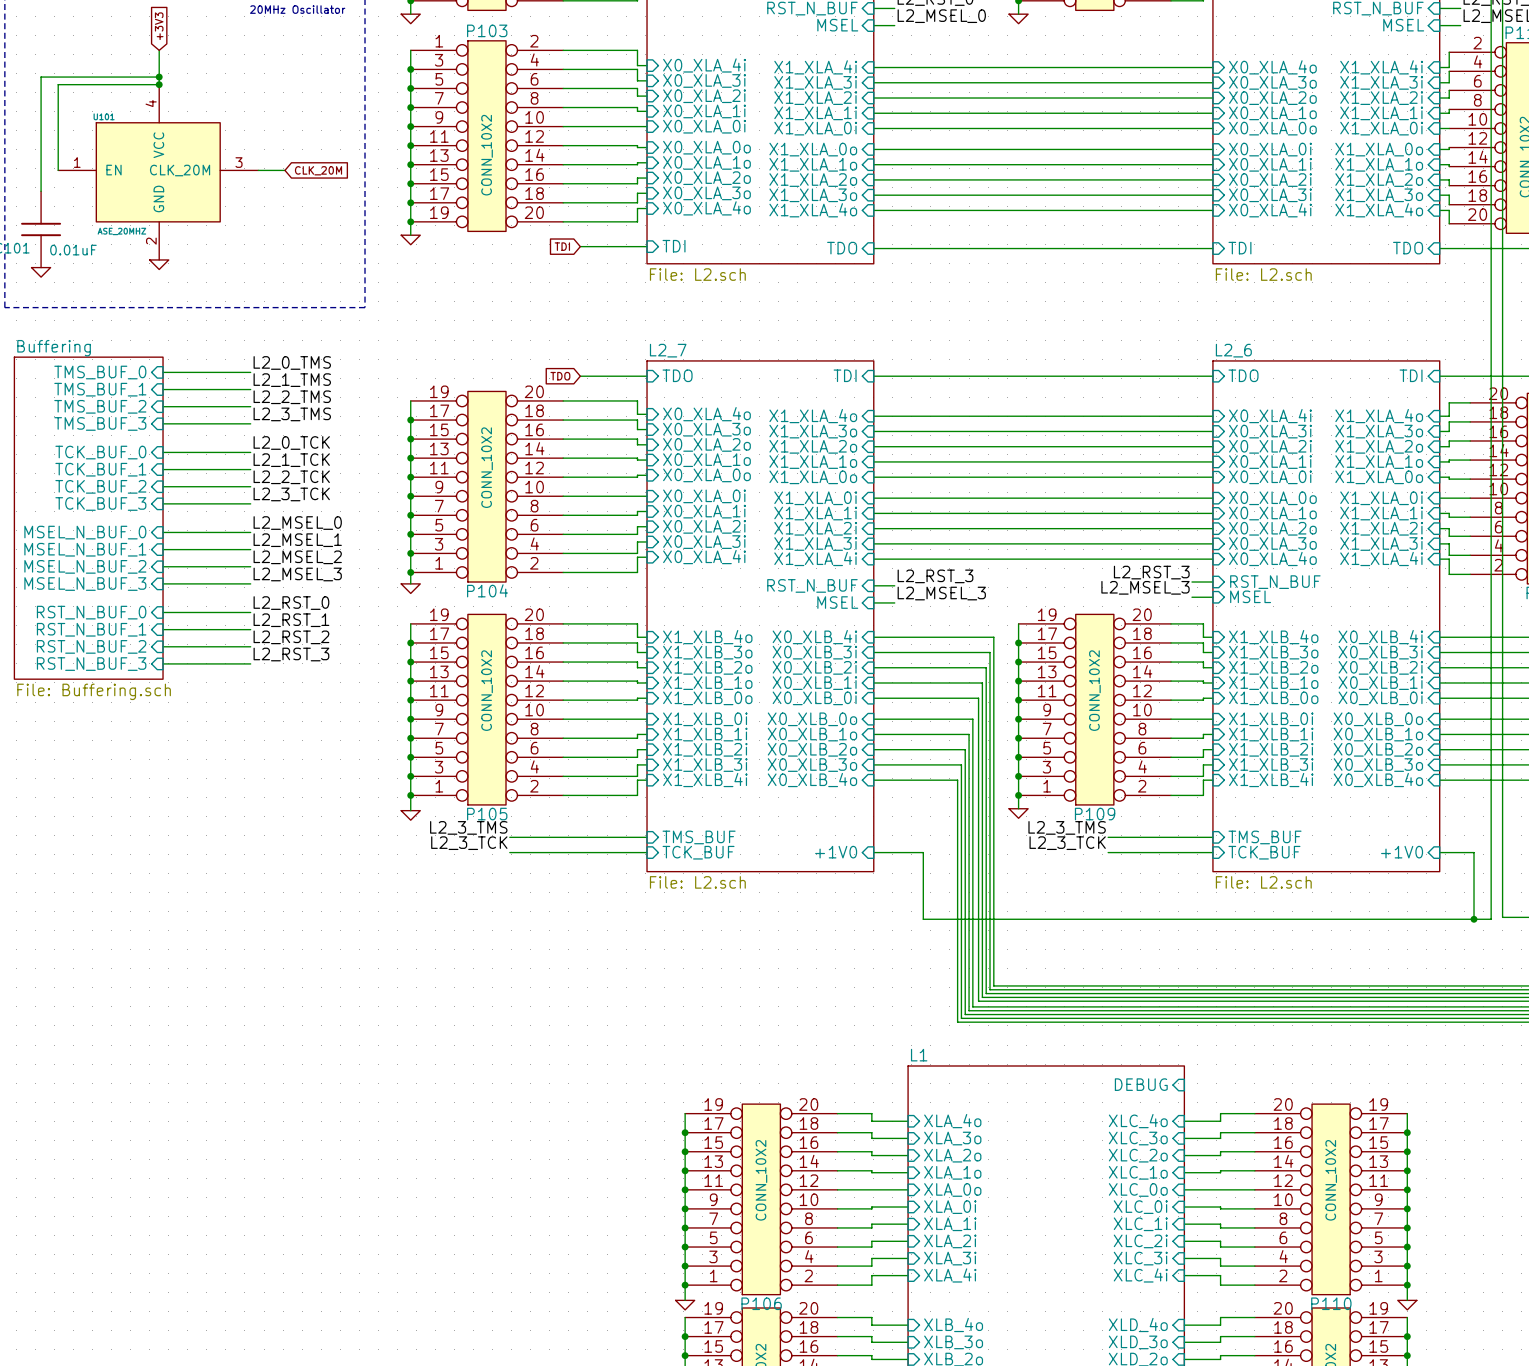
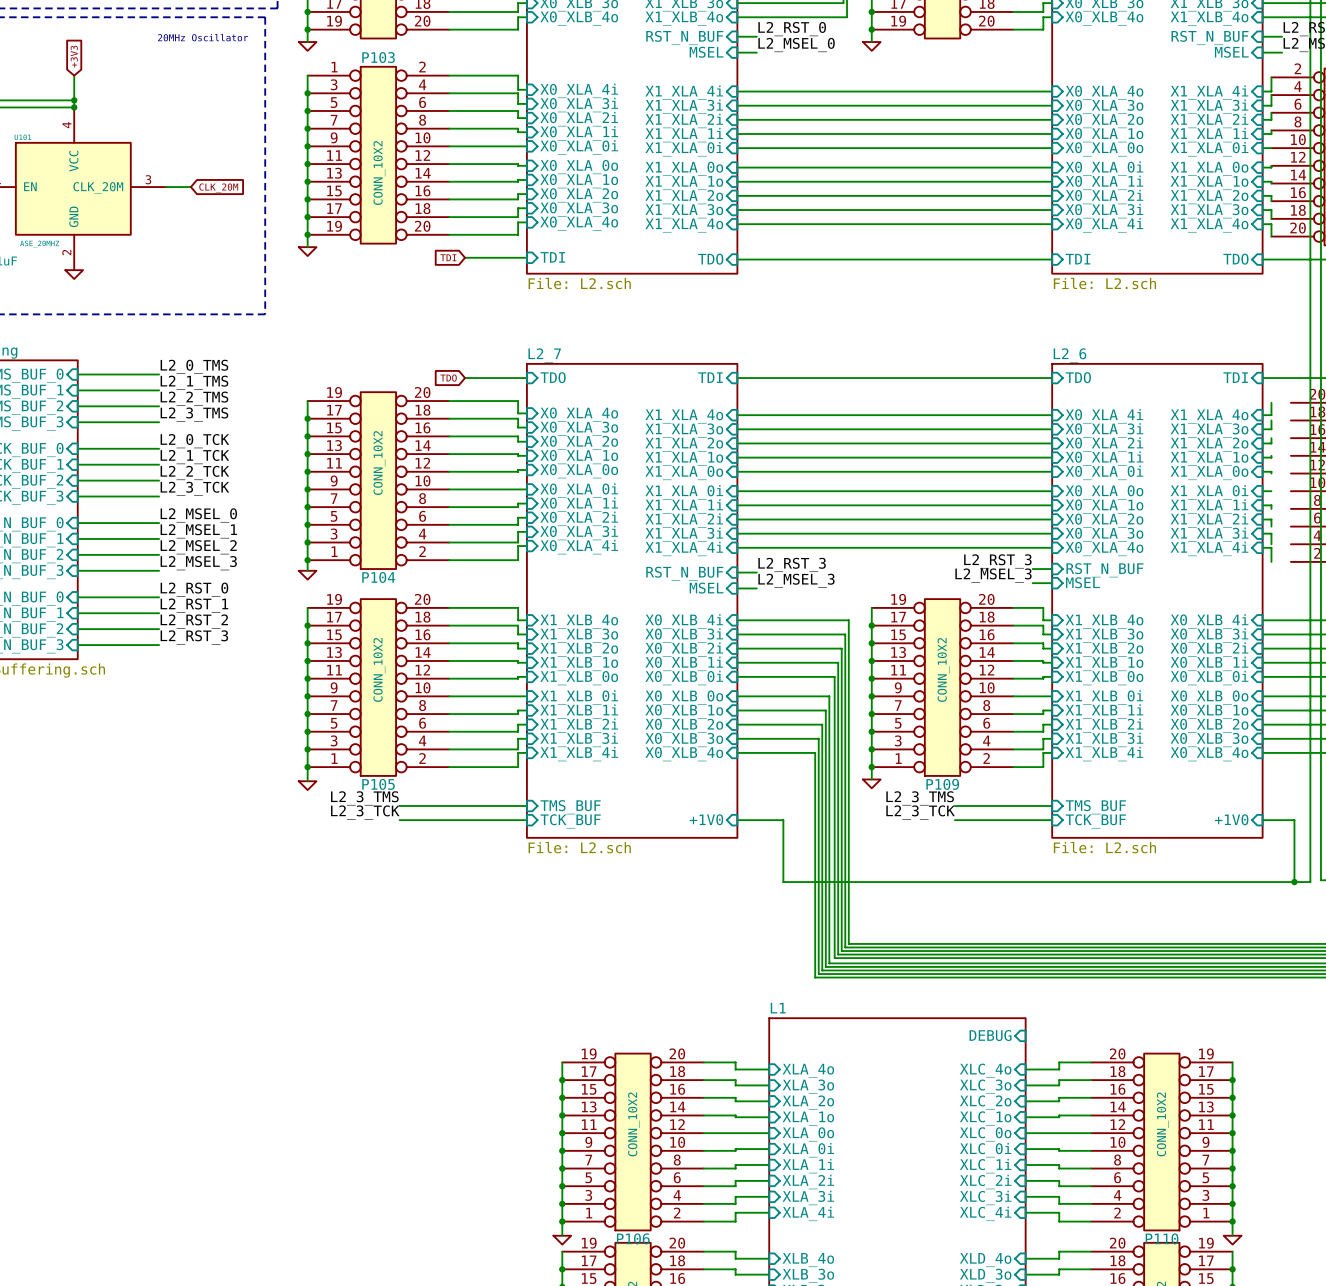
wire: (1449, 402) (1470, 402) -> none
wire: (1449, 421) (1470, 421) -> none
wire: (1449, 440) (1470, 440) -> none
wire: (1449, 460) (1470, 460) -> none
wire: (1449, 479) (1470, 479) -> none
wire: (1449, 498) (1470, 498) -> none
wire: (1449, 517) (1470, 517) -> none
wire: (1449, 536) (1470, 536) -> none
wire: (1449, 555) (1470, 555) -> none
wire: (1449, 574) (1470, 574) -> none

